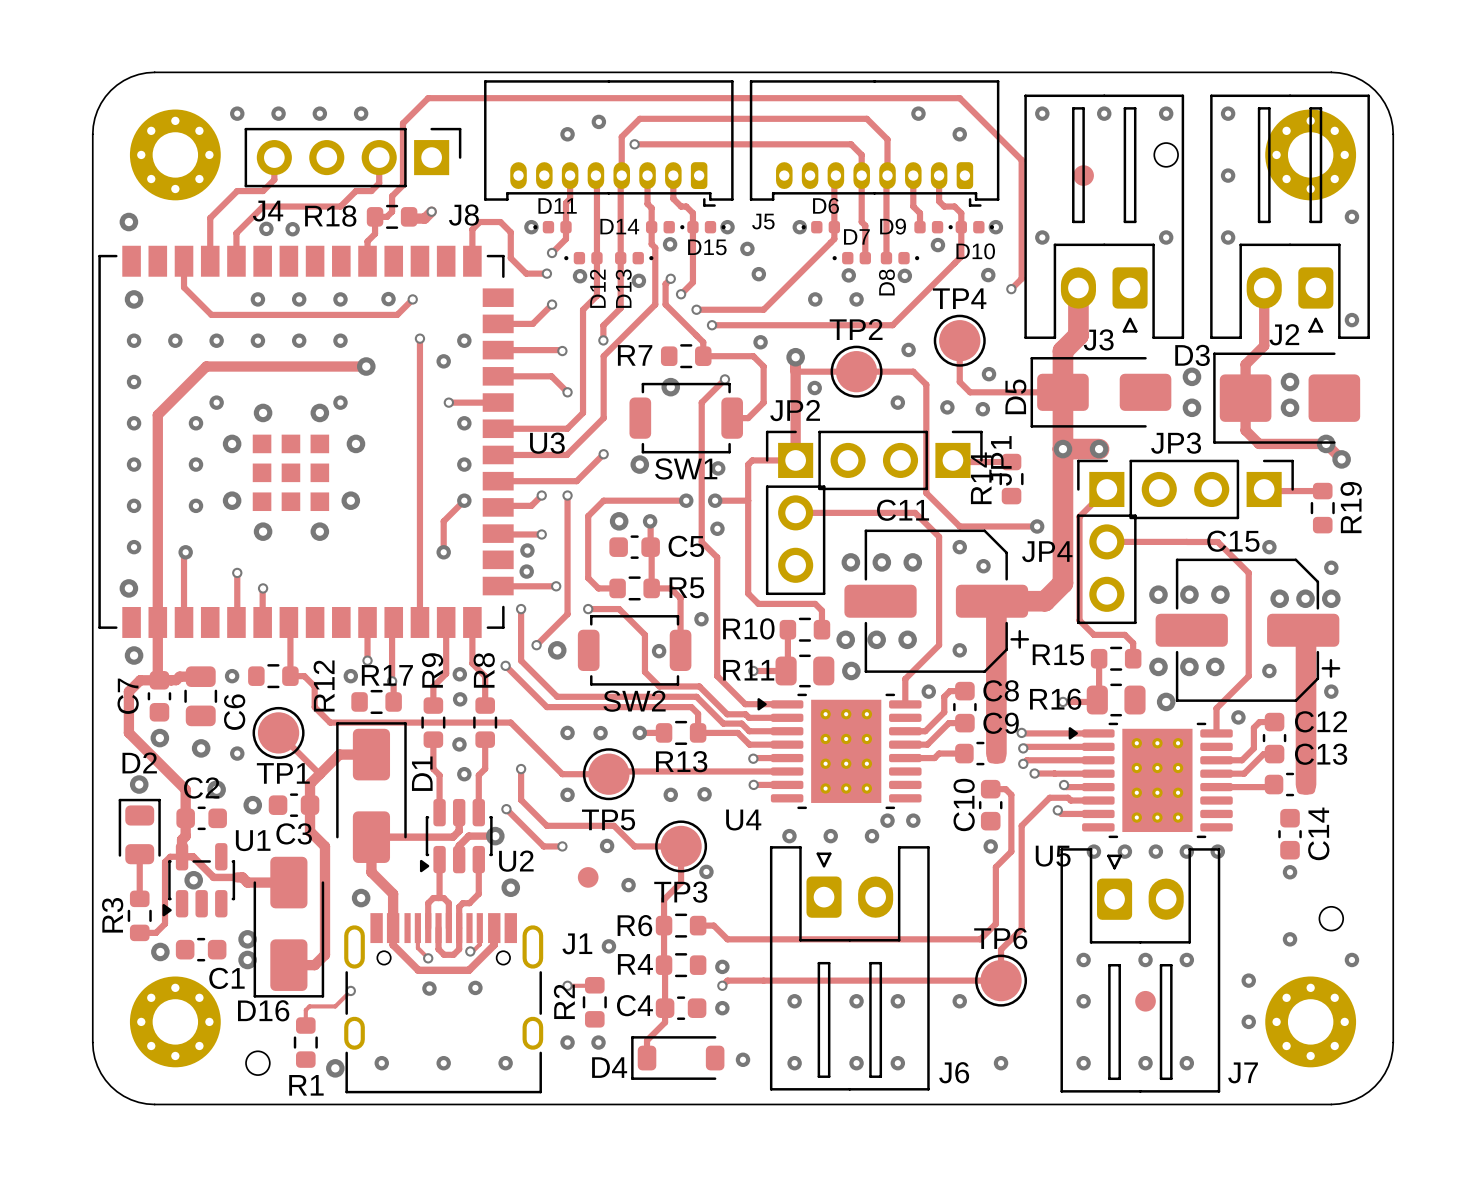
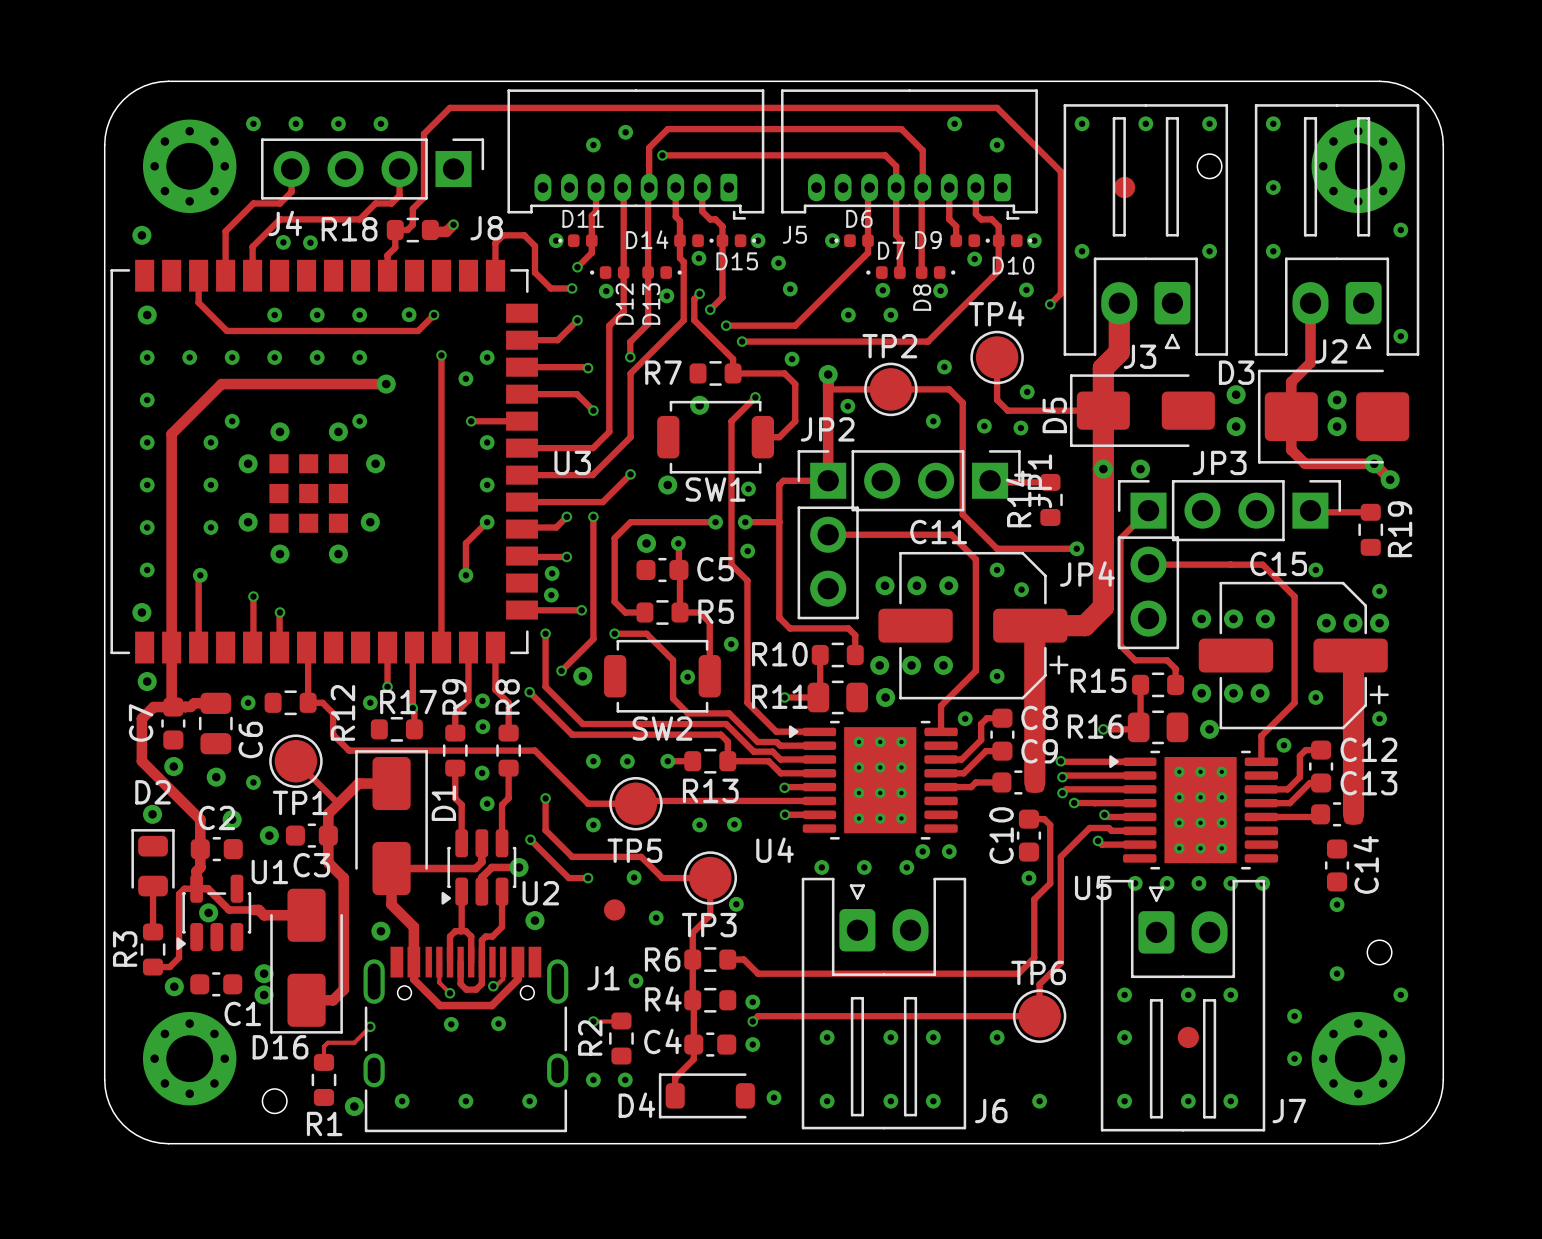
track: (1062, 449) (1099, 449) -> none

